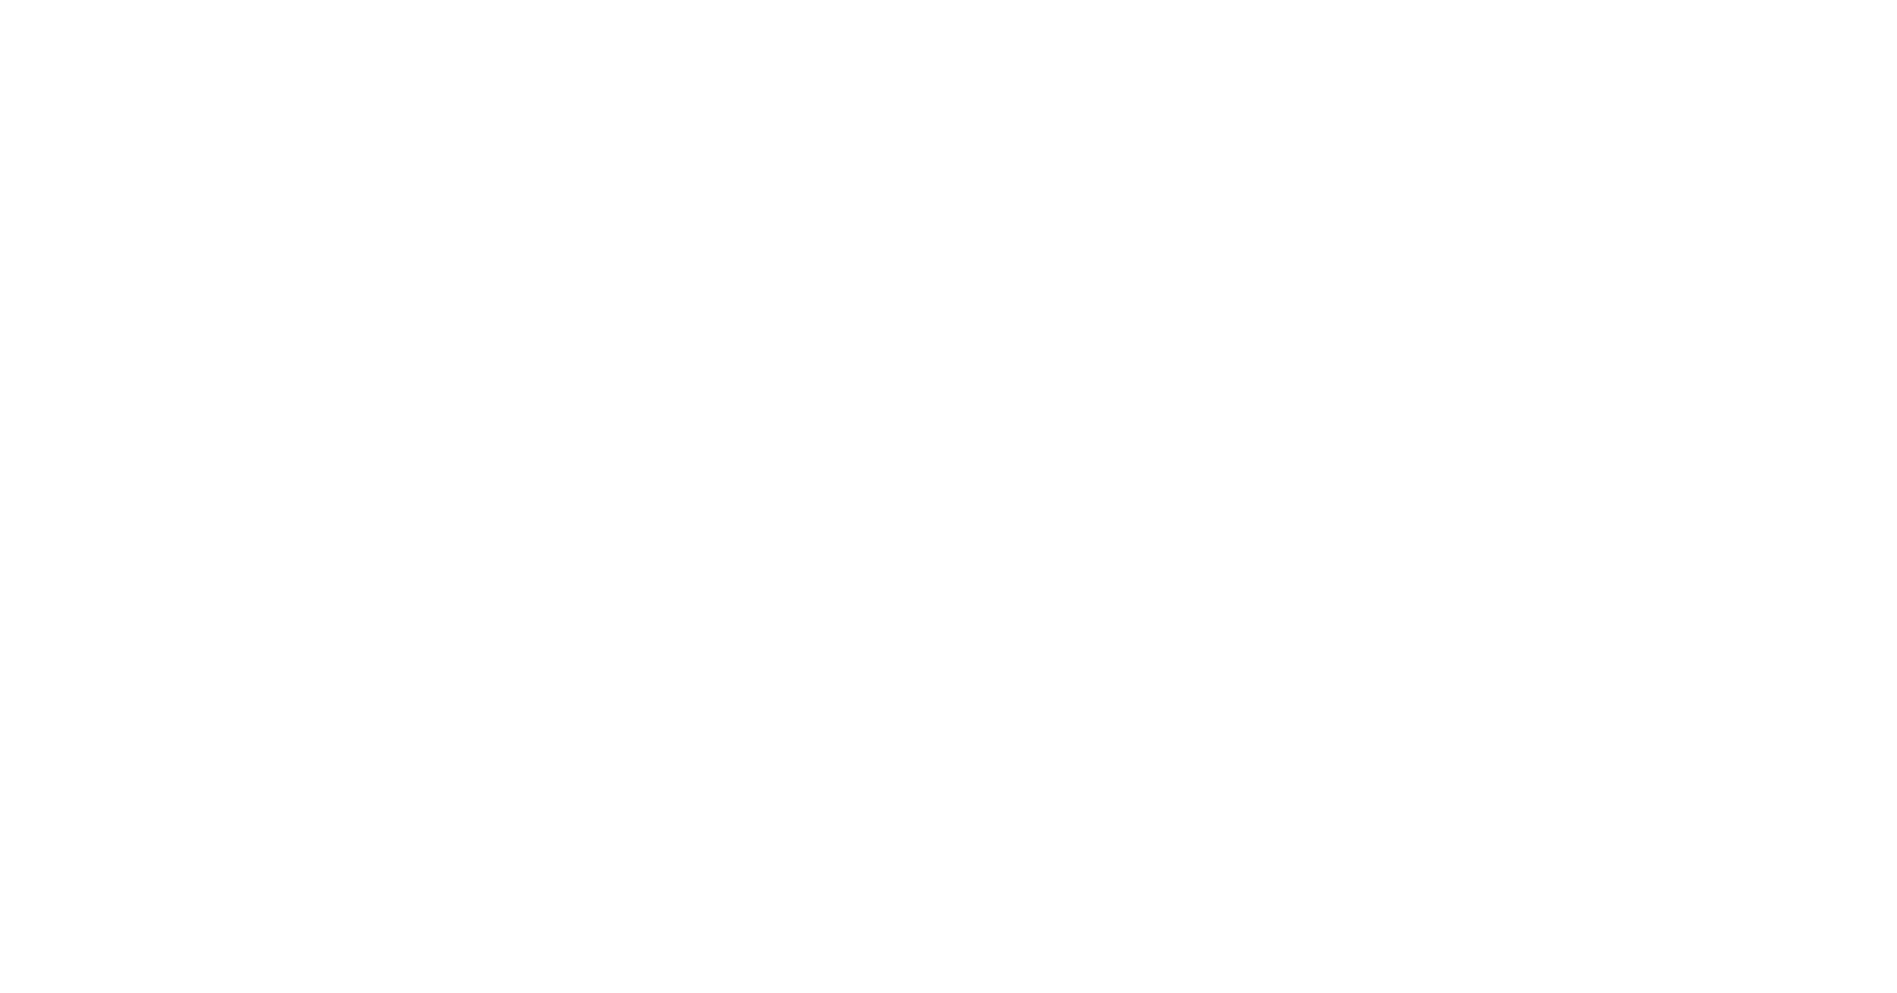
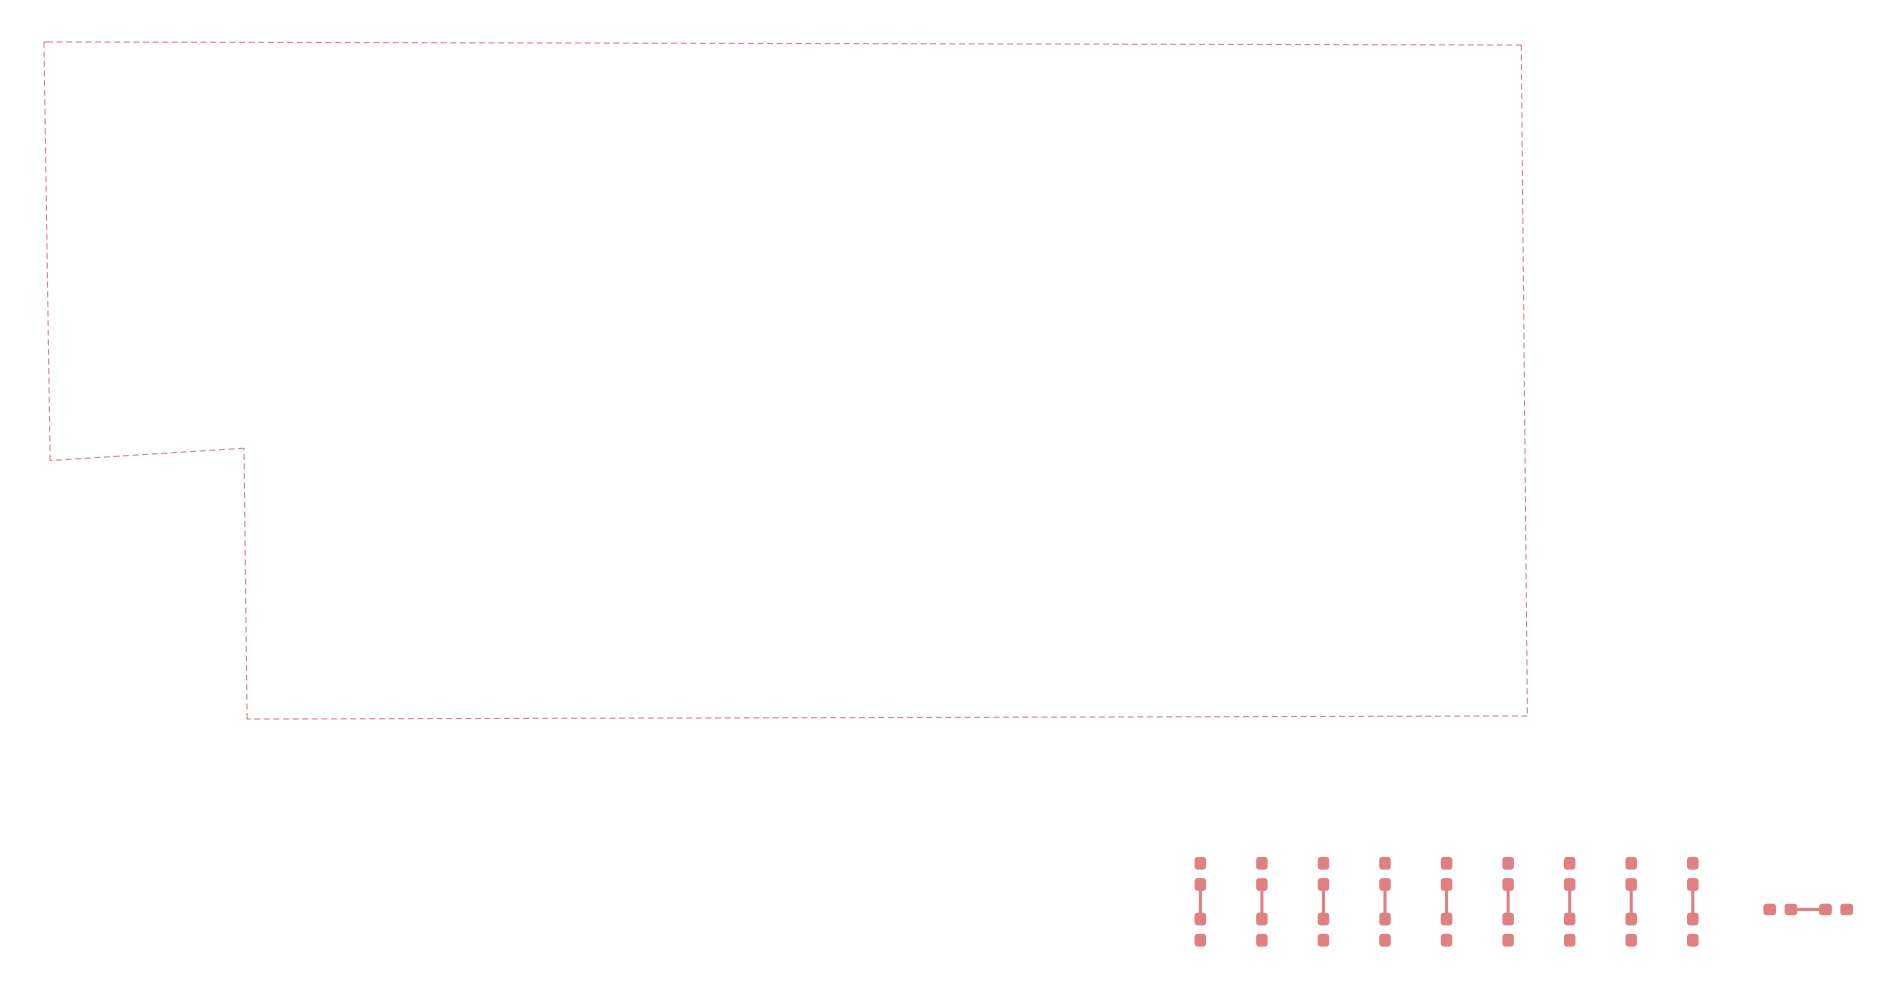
top zone outline: none -> (47, 41) (43, 41) (50, 460) (244, 448) (247, 719) (1527, 715) (1521, 45) (47, 41)
part: none -> (1200, 873)
part: none -> (1261, 873)
part: none -> (1323, 873)
part: none -> (1385, 873)
part: none -> (1446, 873)
part: none -> (1508, 873)
part: none -> (1569, 873)
part: none -> (1631, 873)
part: none -> (1692, 873)
top track: none -> (1200, 884) (1200, 919)
top track: none -> (1261, 884) (1261, 919)
top track: none -> (1323, 884) (1323, 919)
top track: none -> (1385, 884) (1385, 919)
top track: none -> (1446, 884) (1446, 919)
top track: none -> (1508, 884) (1508, 919)
top track: none -> (1569, 884) (1569, 919)
top track: none -> (1631, 884) (1631, 919)
top track: none -> (1692, 884) (1692, 919)
part: none -> (1780, 909)
top track: none -> (1825, 909) (1790, 909)
part: none -> (1836, 909)
part: none -> (1200, 929)
part: none -> (1261, 929)
part: none -> (1323, 929)
part: none -> (1385, 929)
part: none -> (1446, 929)
part: none -> (1508, 929)
part: none -> (1569, 929)
part: none -> (1631, 929)
part: none -> (1692, 929)

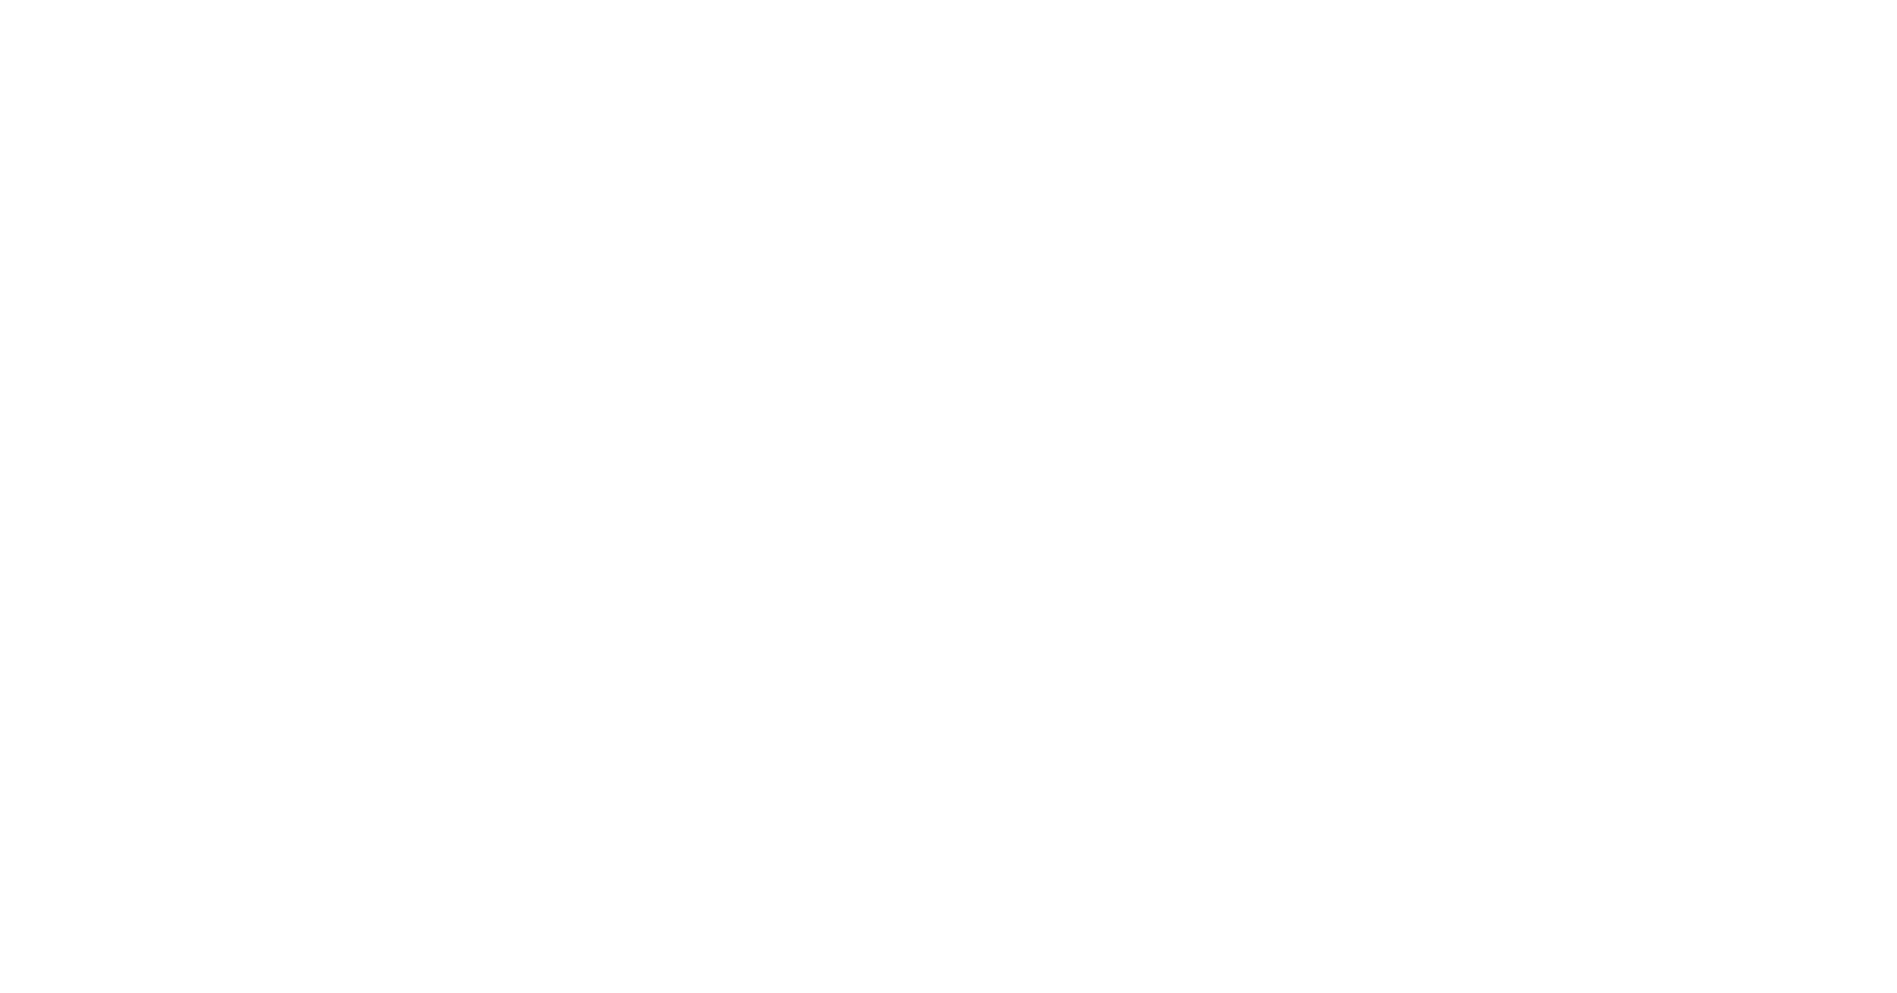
top zone outline: (47, 41) (43, 41) (50, 460) (244, 448) (247, 719) (1527, 715) (1521, 45) (47, 41) -> none
part: (1200, 873) -> none
part: (1261, 873) -> none
part: (1323, 873) -> none
part: (1385, 873) -> none
part: (1446, 873) -> none
part: (1508, 873) -> none
part: (1569, 873) -> none
part: (1631, 873) -> none
part: (1692, 873) -> none
top track: (1200, 884) (1200, 919) -> none
top track: (1261, 884) (1261, 919) -> none
top track: (1323, 884) (1323, 919) -> none
top track: (1385, 884) (1385, 919) -> none
top track: (1446, 884) (1446, 919) -> none
top track: (1508, 884) (1508, 919) -> none
top track: (1569, 884) (1569, 919) -> none
top track: (1631, 884) (1631, 919) -> none
top track: (1692, 884) (1692, 919) -> none
part: (1780, 909) -> none
top track: (1825, 909) (1790, 909) -> none
part: (1836, 909) -> none
part: (1200, 929) -> none
part: (1261, 929) -> none
part: (1323, 929) -> none
part: (1385, 929) -> none
part: (1446, 929) -> none
part: (1508, 929) -> none
part: (1569, 929) -> none
part: (1631, 929) -> none
part: (1692, 929) -> none

